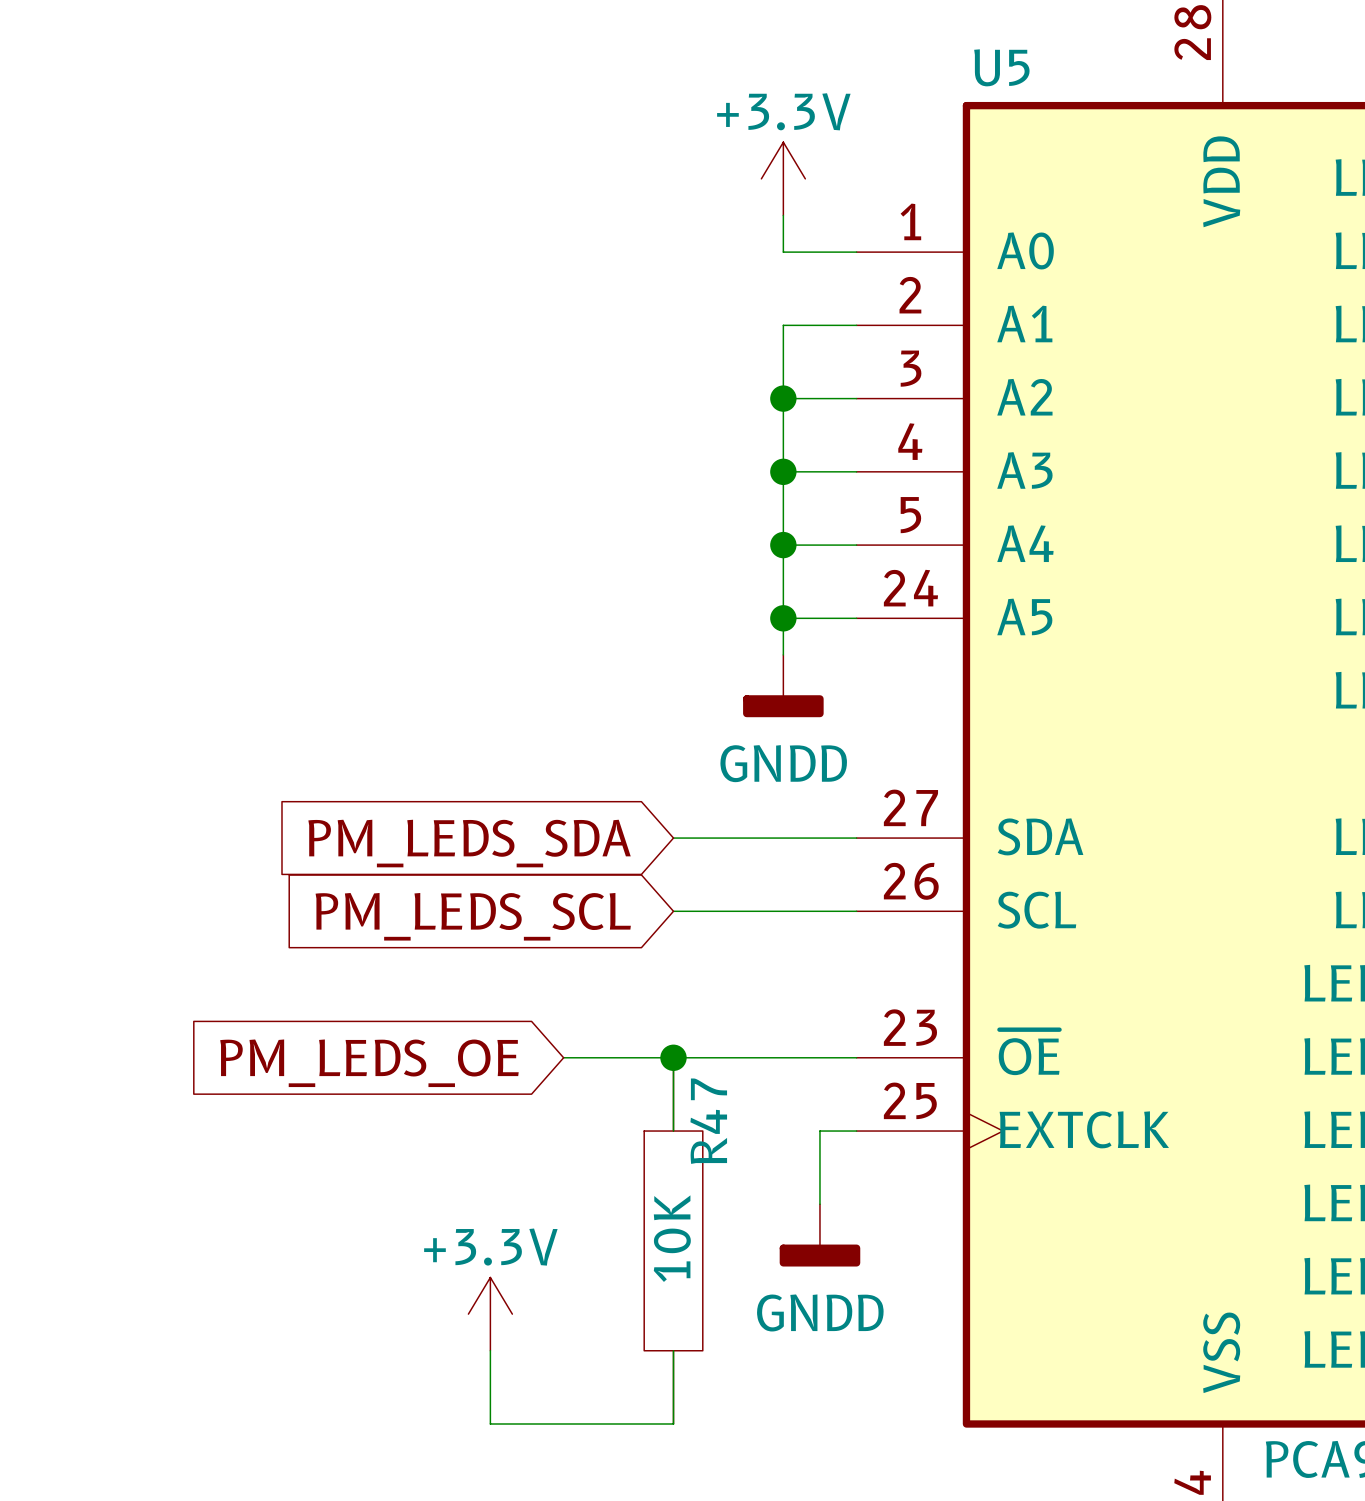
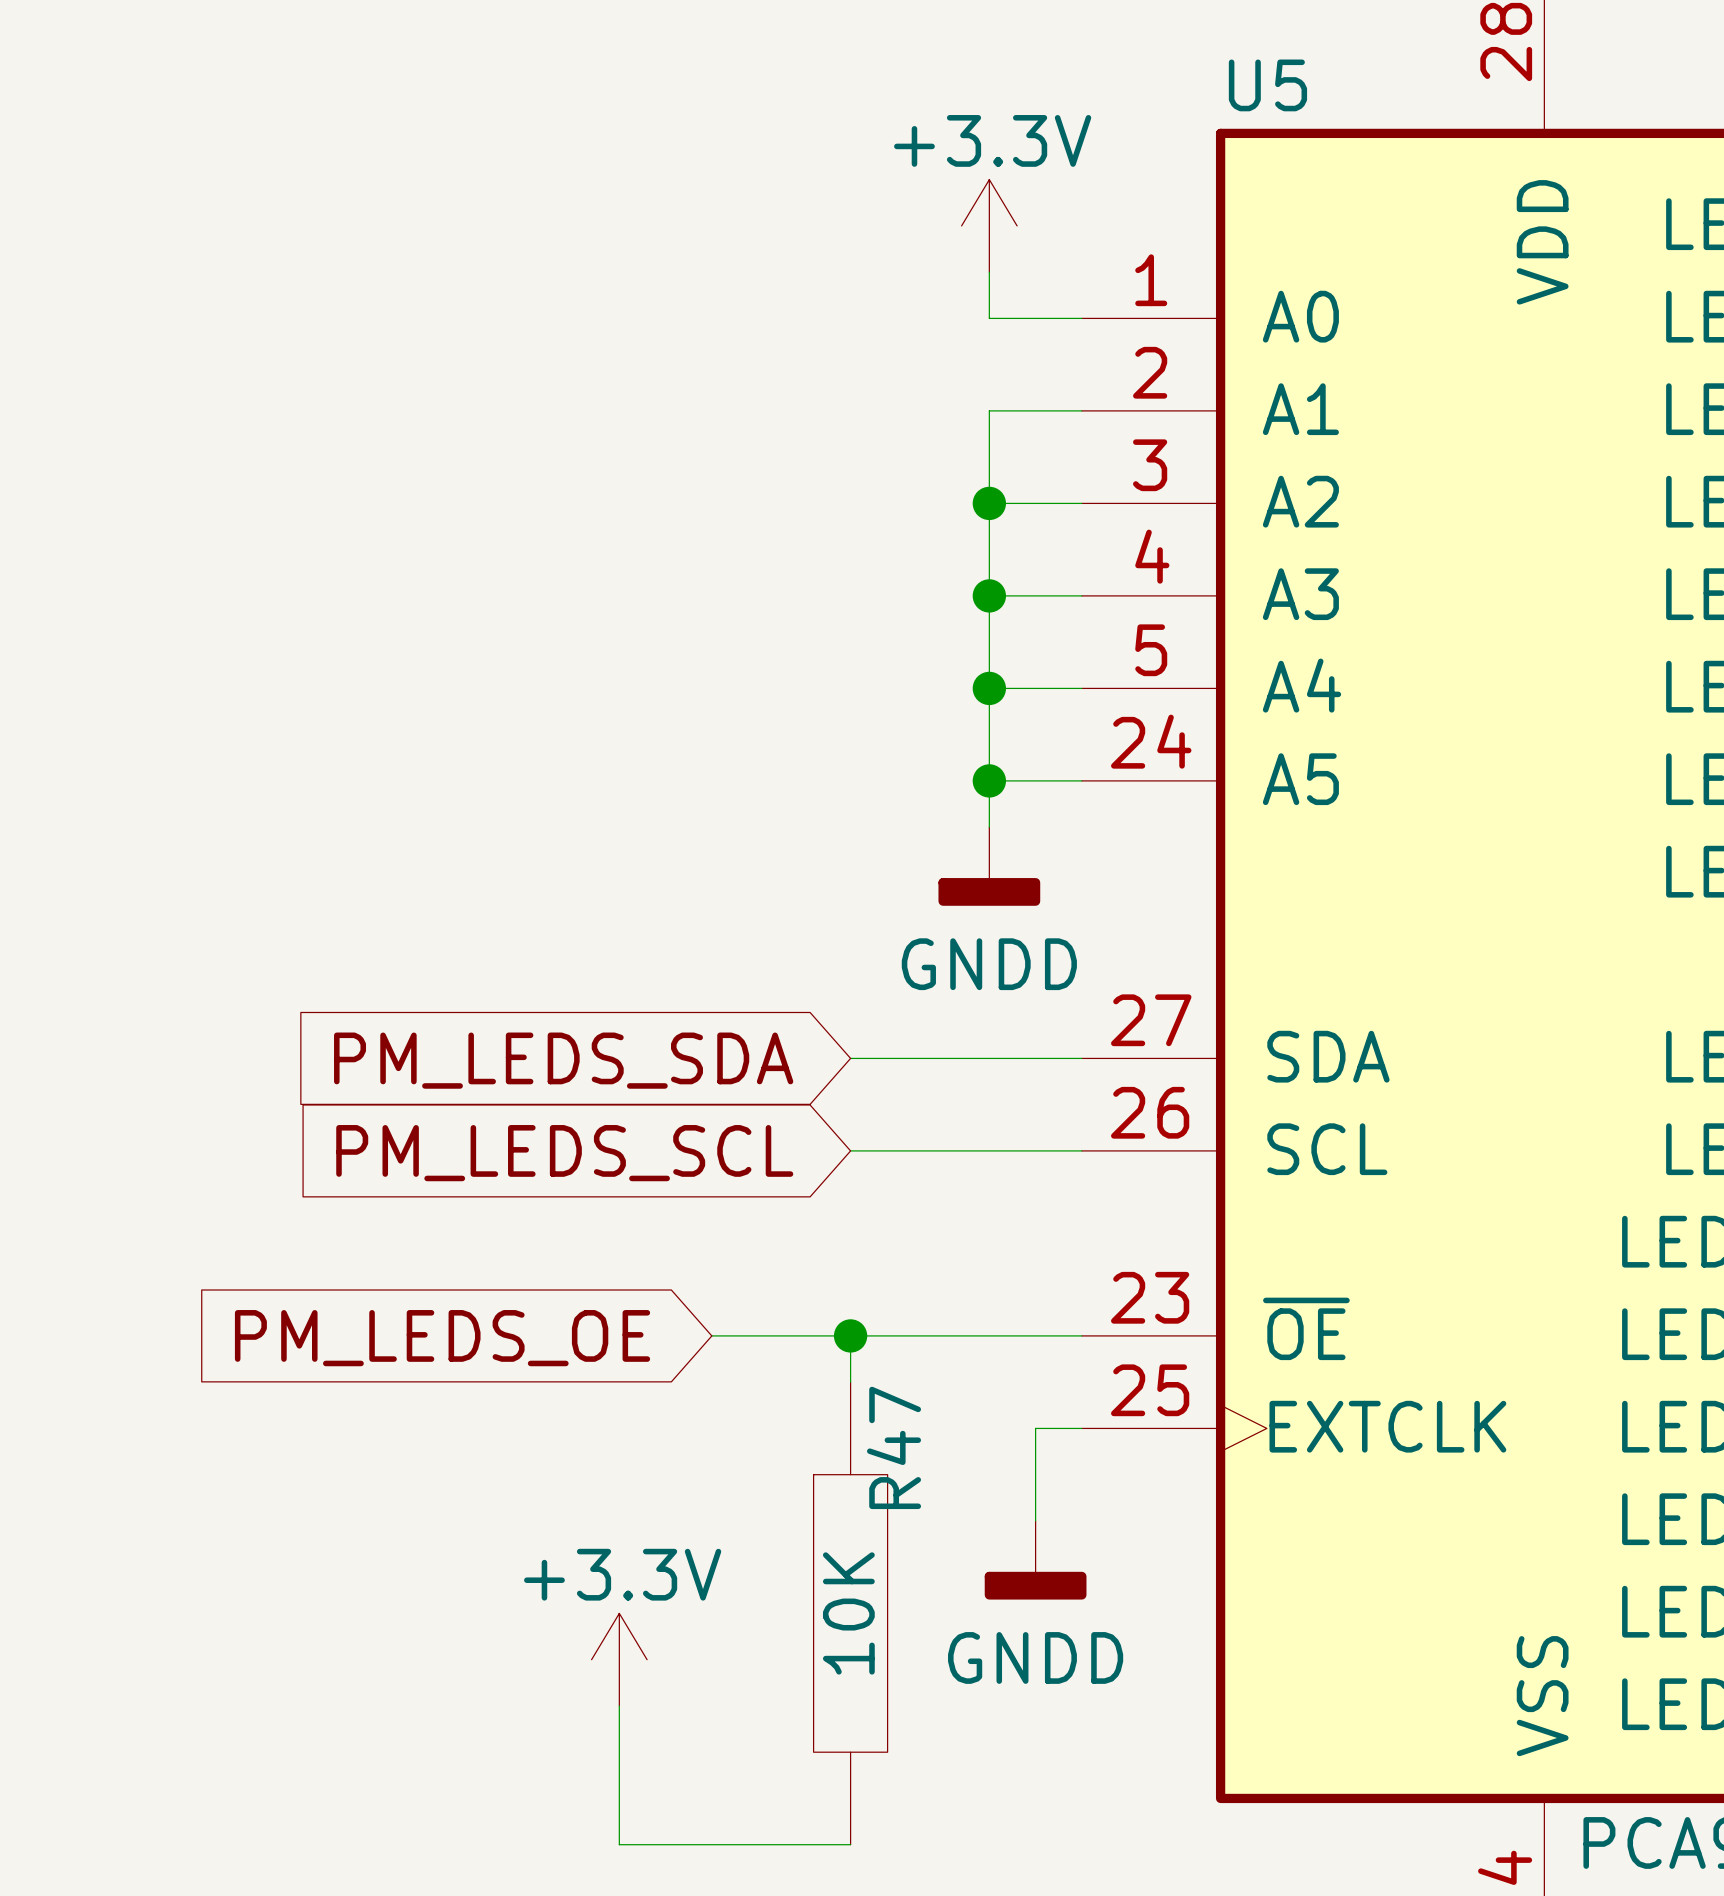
R47 position: (673, 1240) -> (850, 1613)
wire: (673, 1350) (673, 1423) (490, 1423) -> (850, 1844) (619, 1844) (619, 1798)

